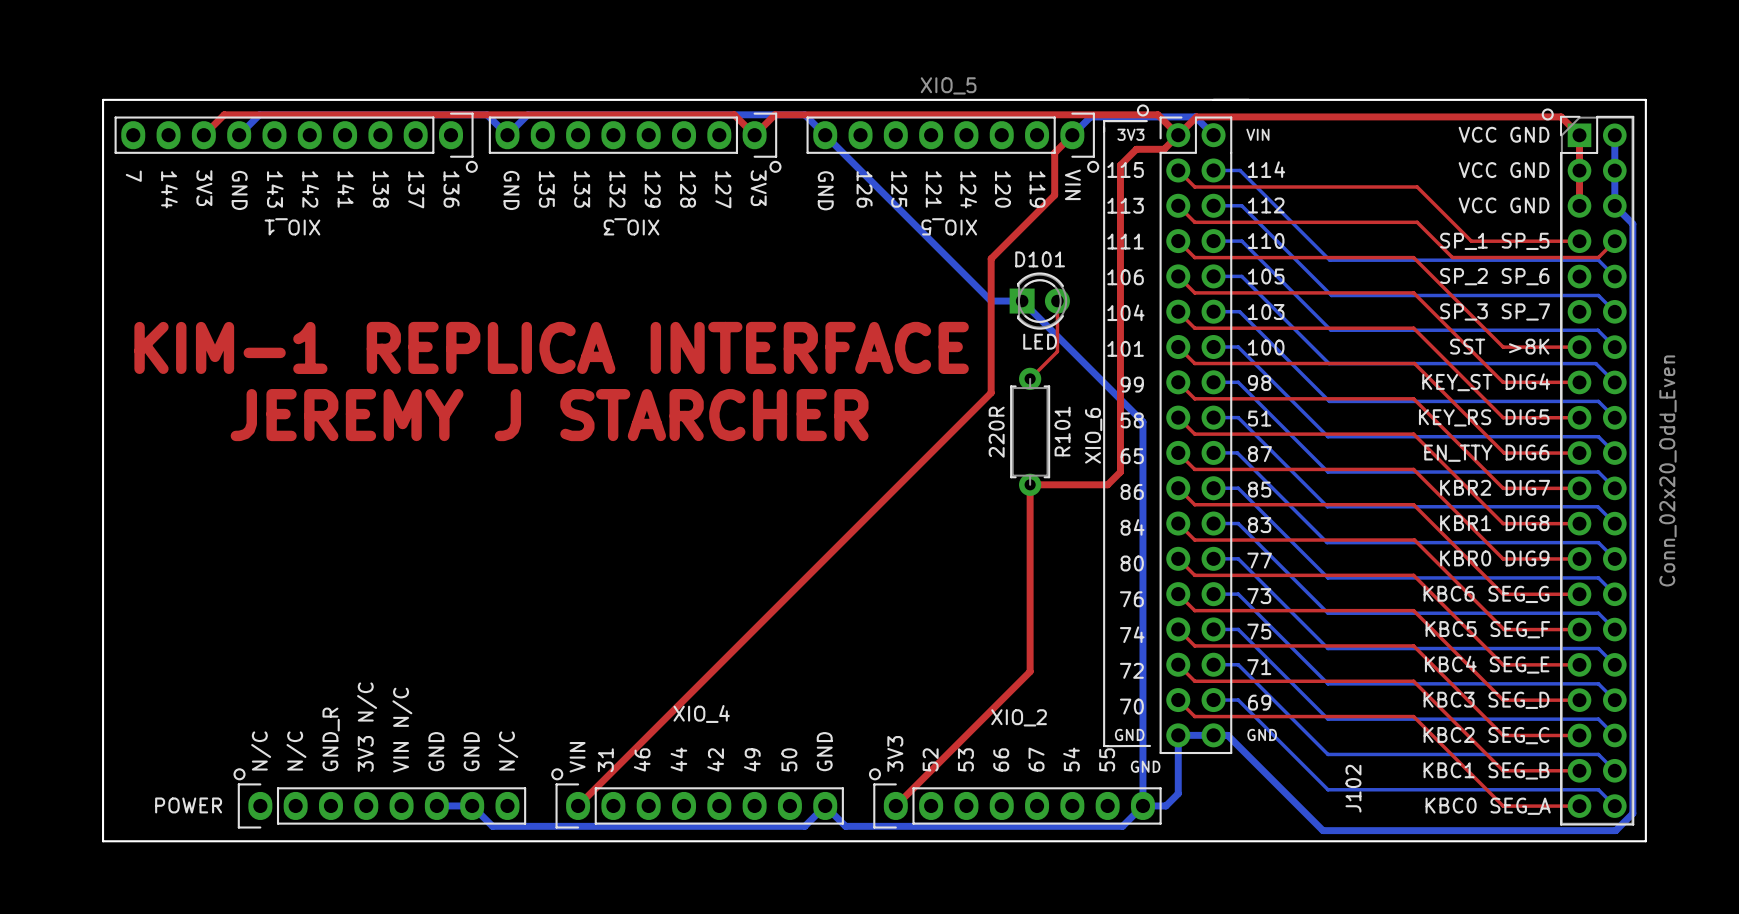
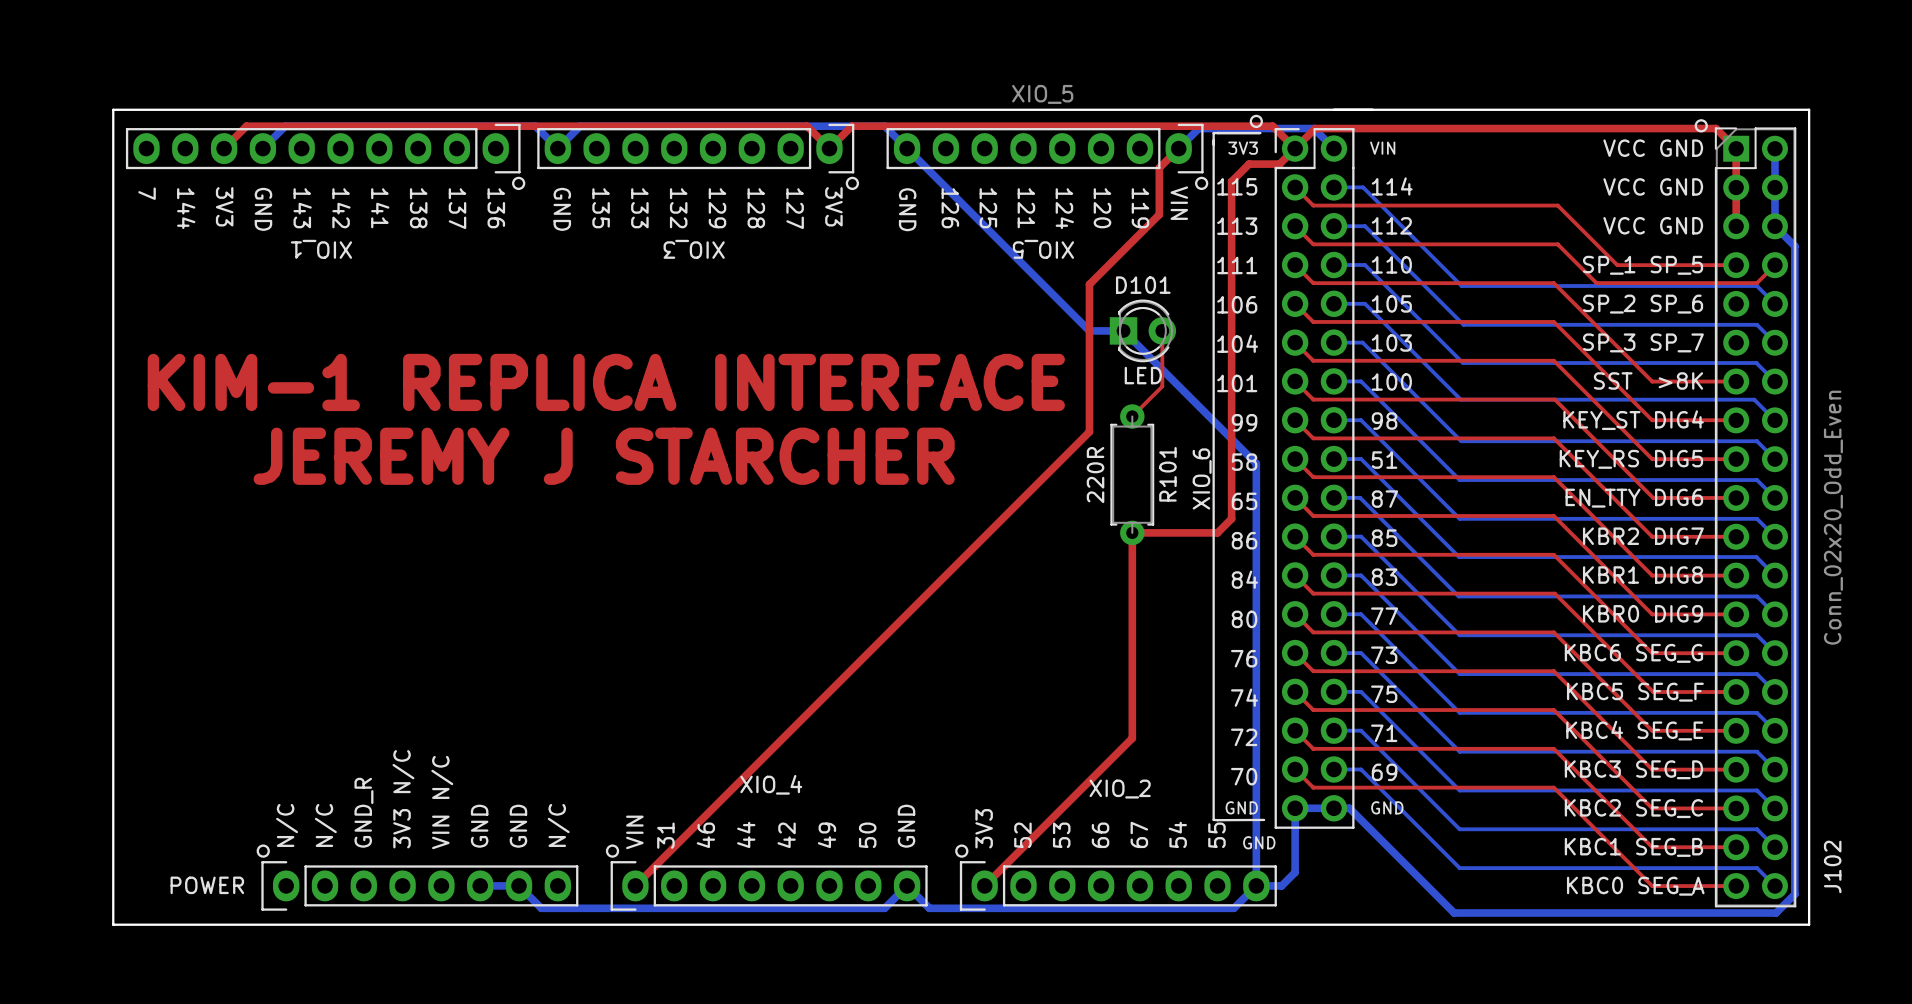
J102 name position: J102 (1353, 788) -> J102 (1832, 866)

